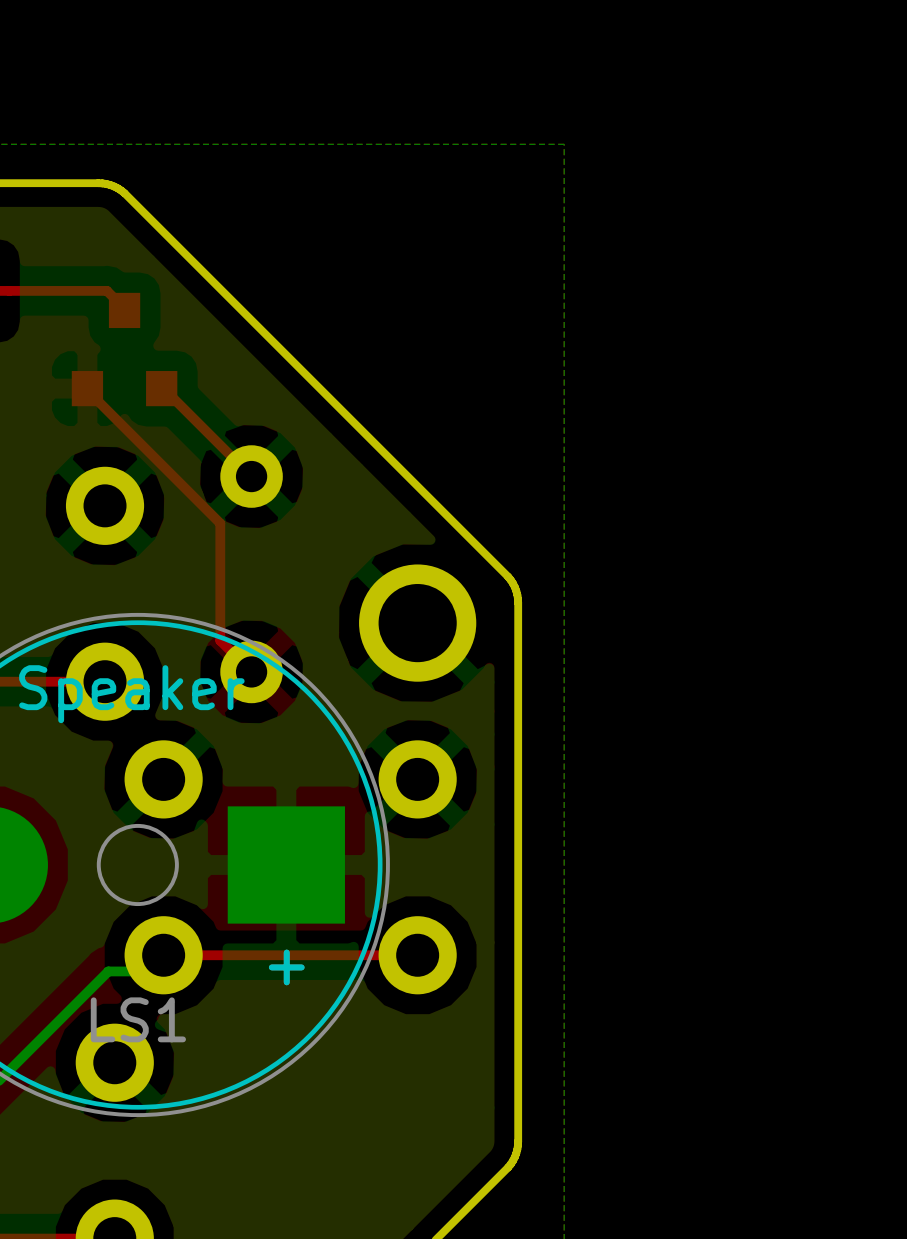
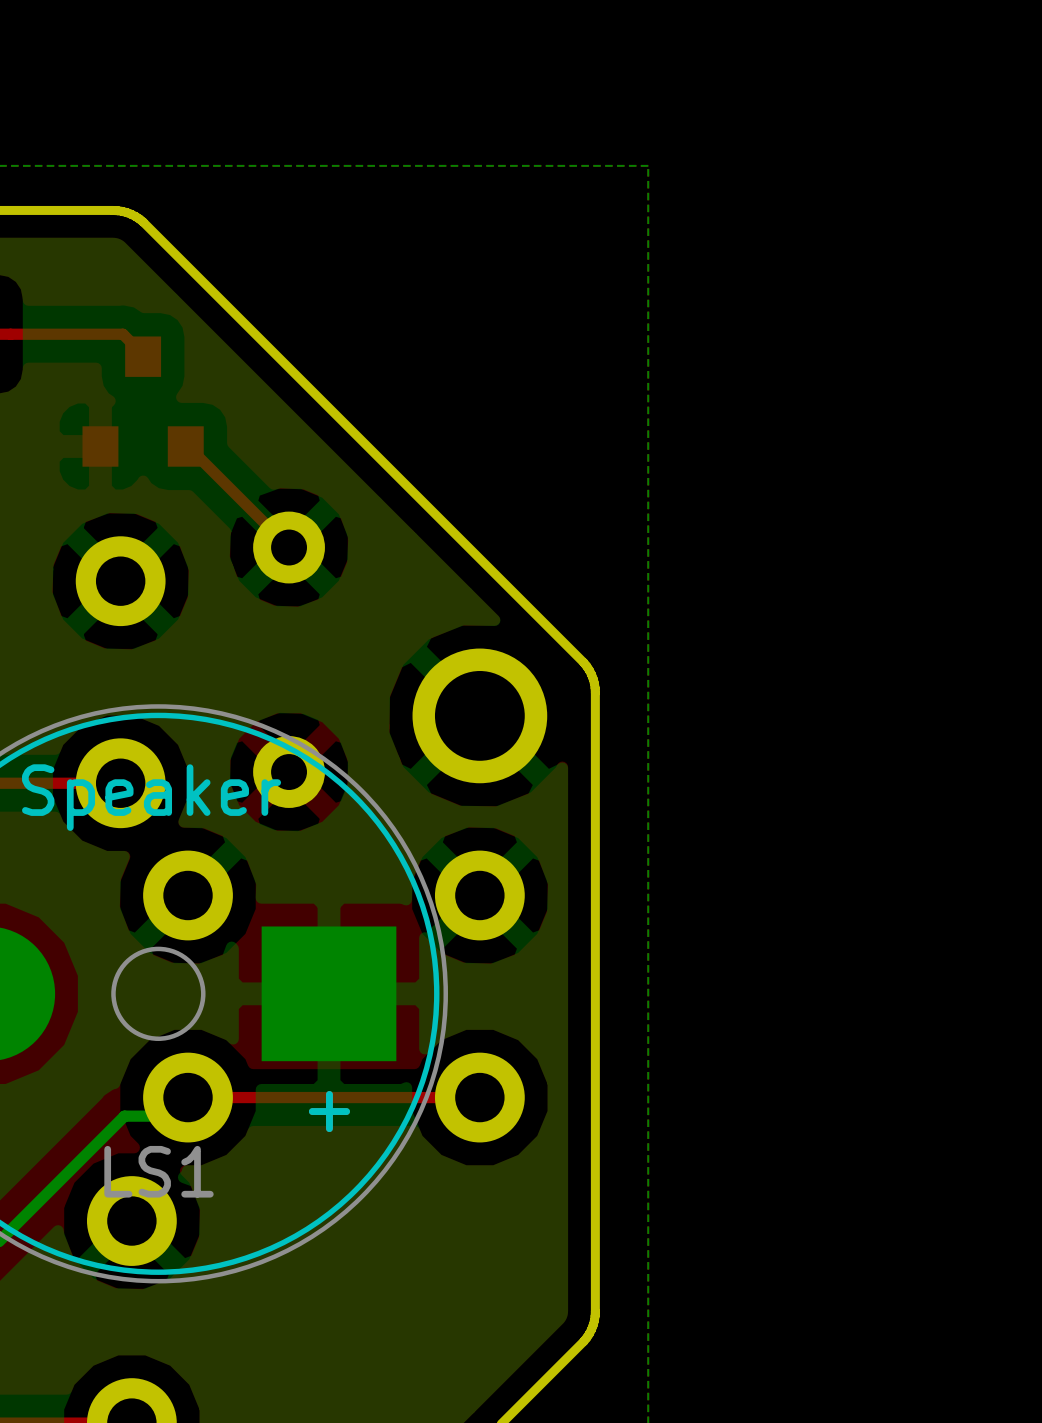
top track: (87, 390) (220, 523) (220, 640) (251, 671) -> none

